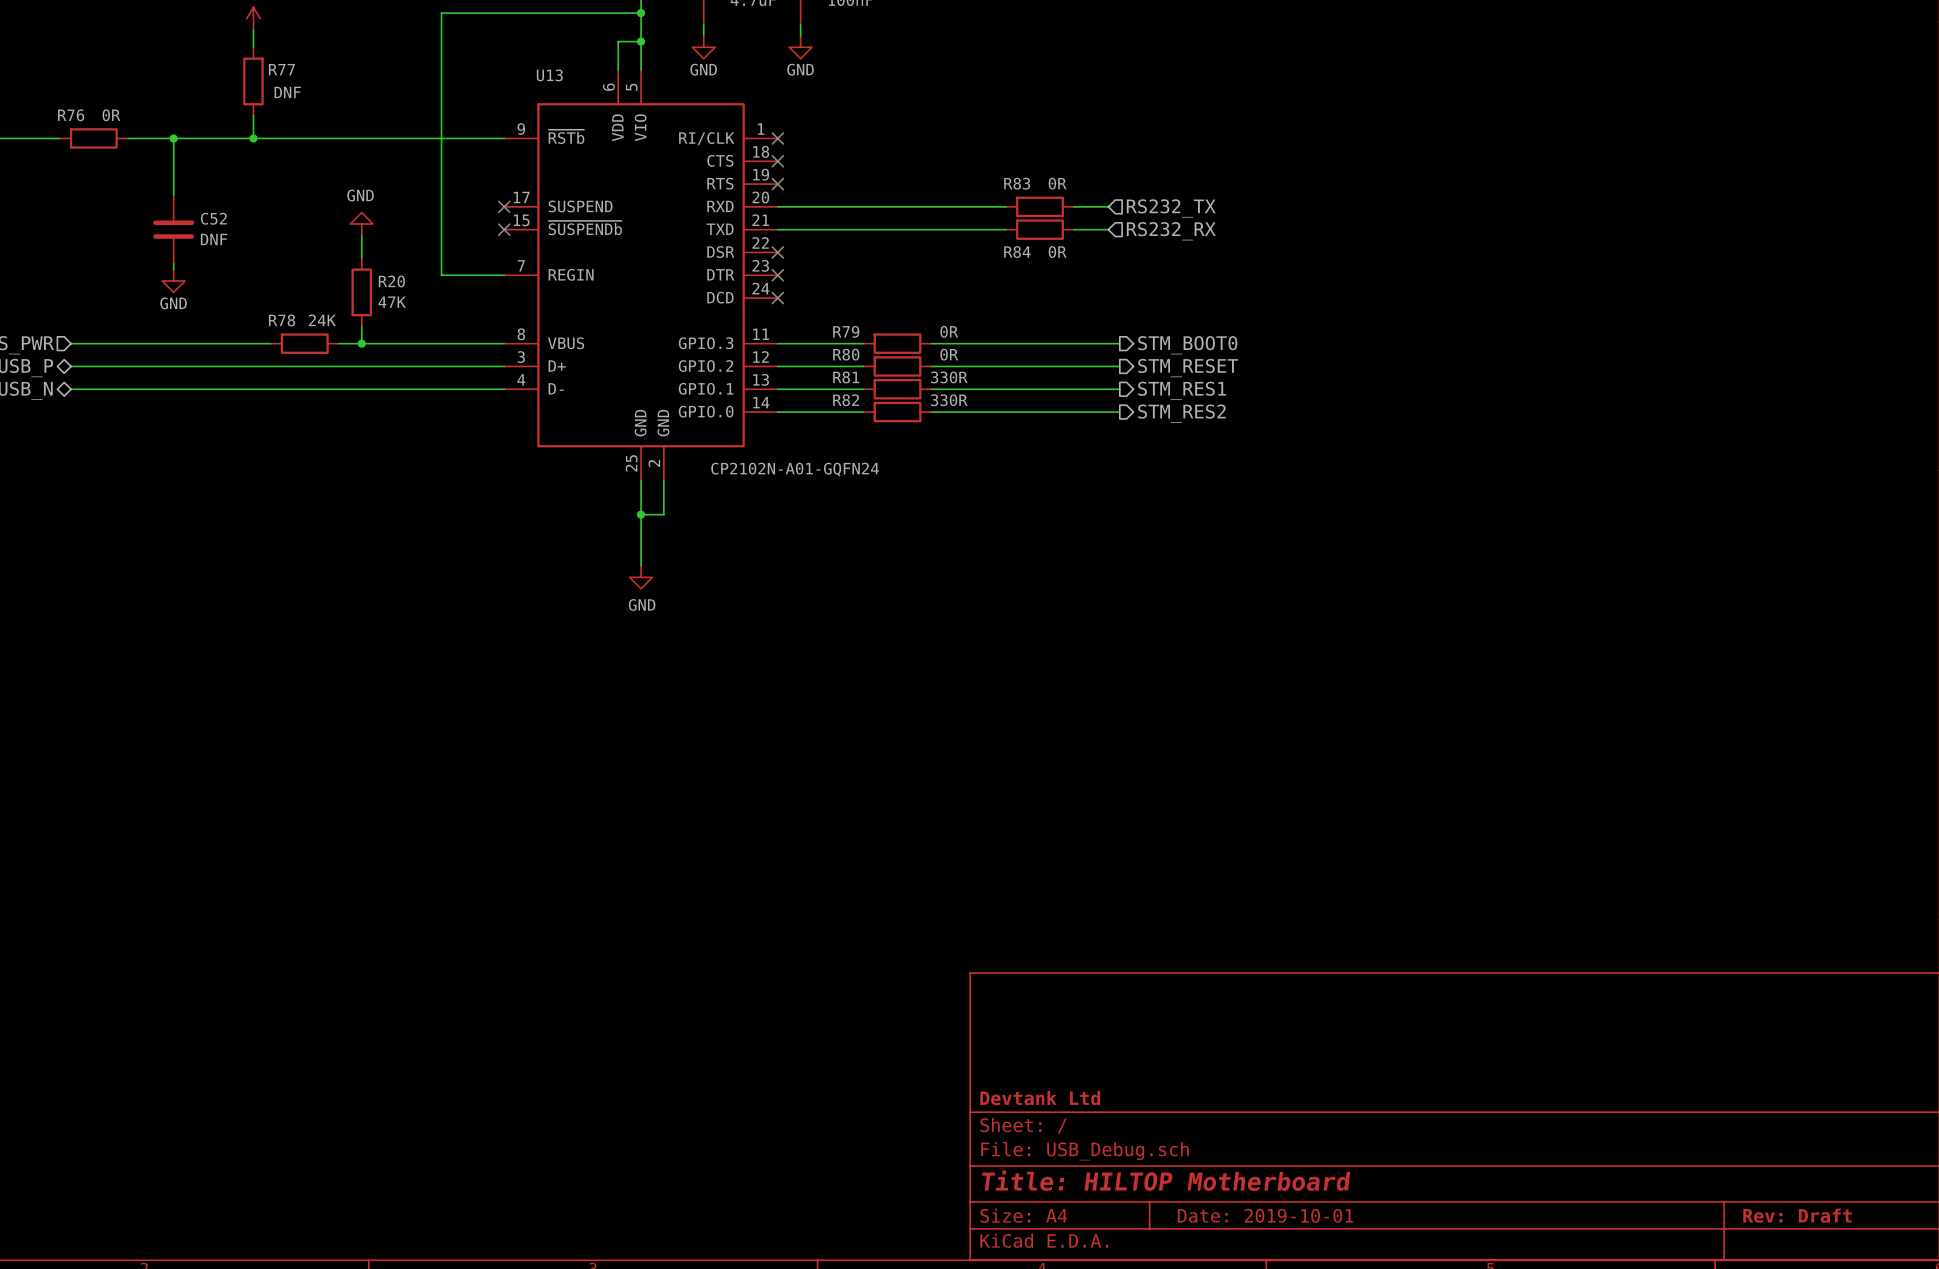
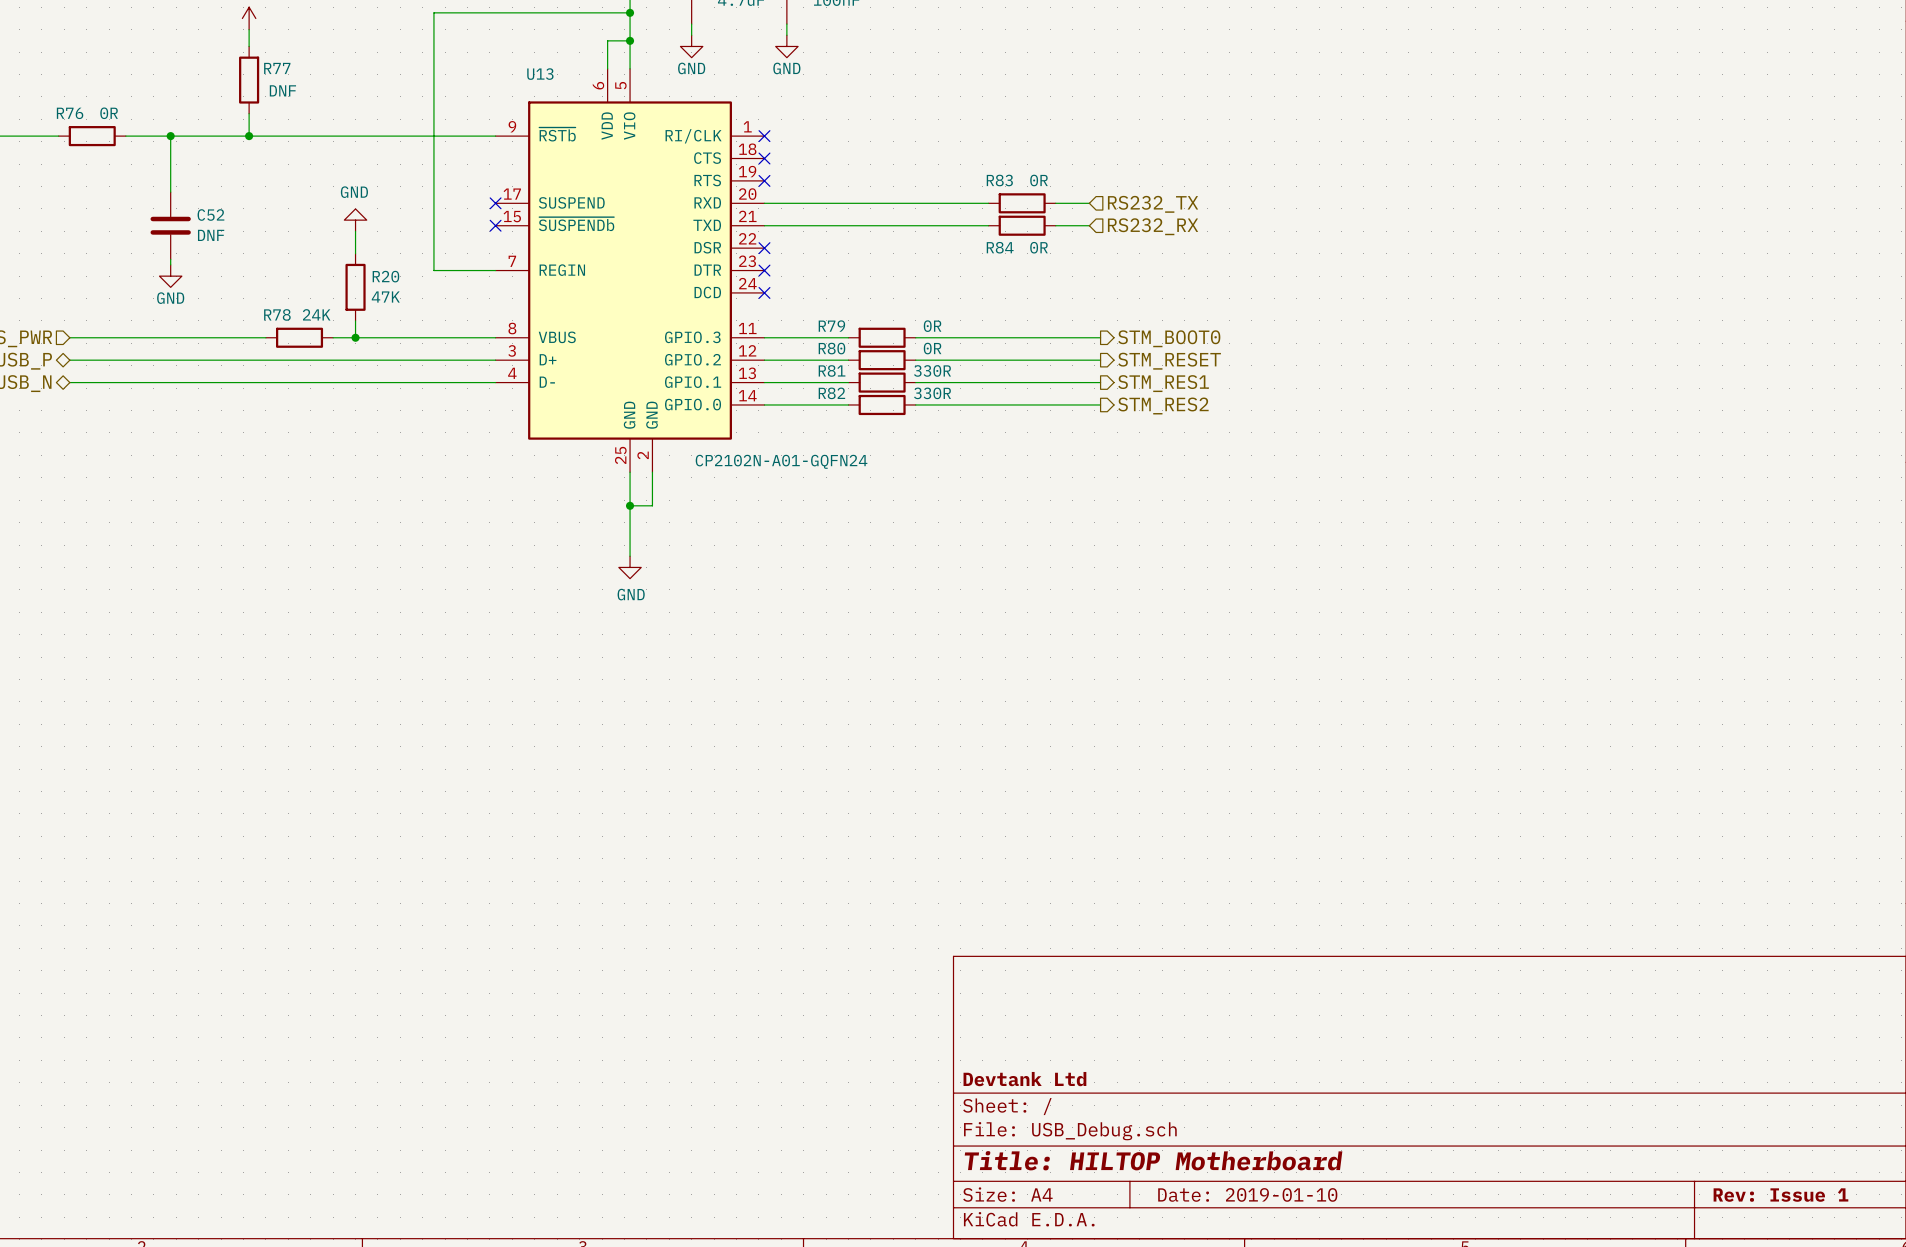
title block: Date: 2019-10-01 (1265, 1215) -> Date: 2019-01-10 (1247, 1194)
title block: Rev: Draft (1797, 1215) -> Rev: Issue 1 (1780, 1195)

